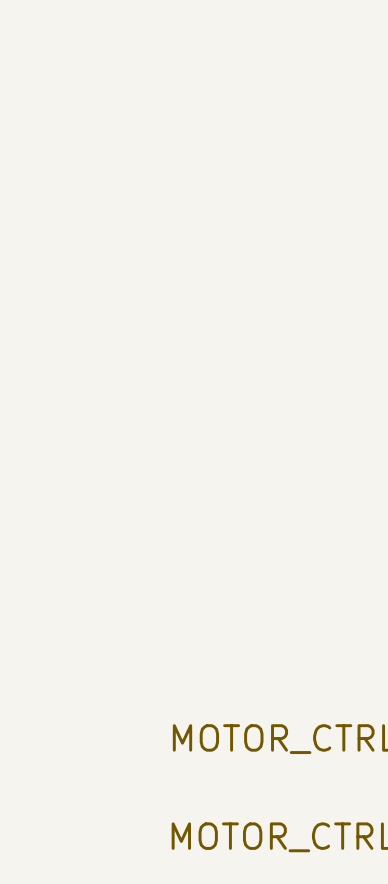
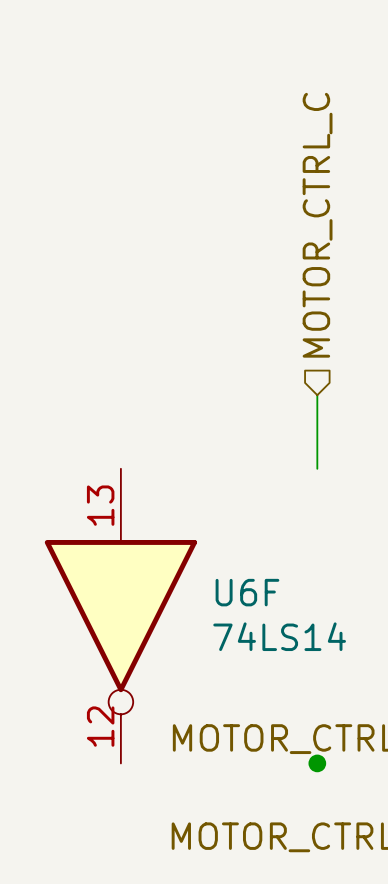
hierarchical label: none -> MOTOR_CTRL_C (317, 225)
wire: none -> (317, 395) (317, 468)
U6F: none -> 74LS14 (120, 616)
junction: none -> (317, 763)

